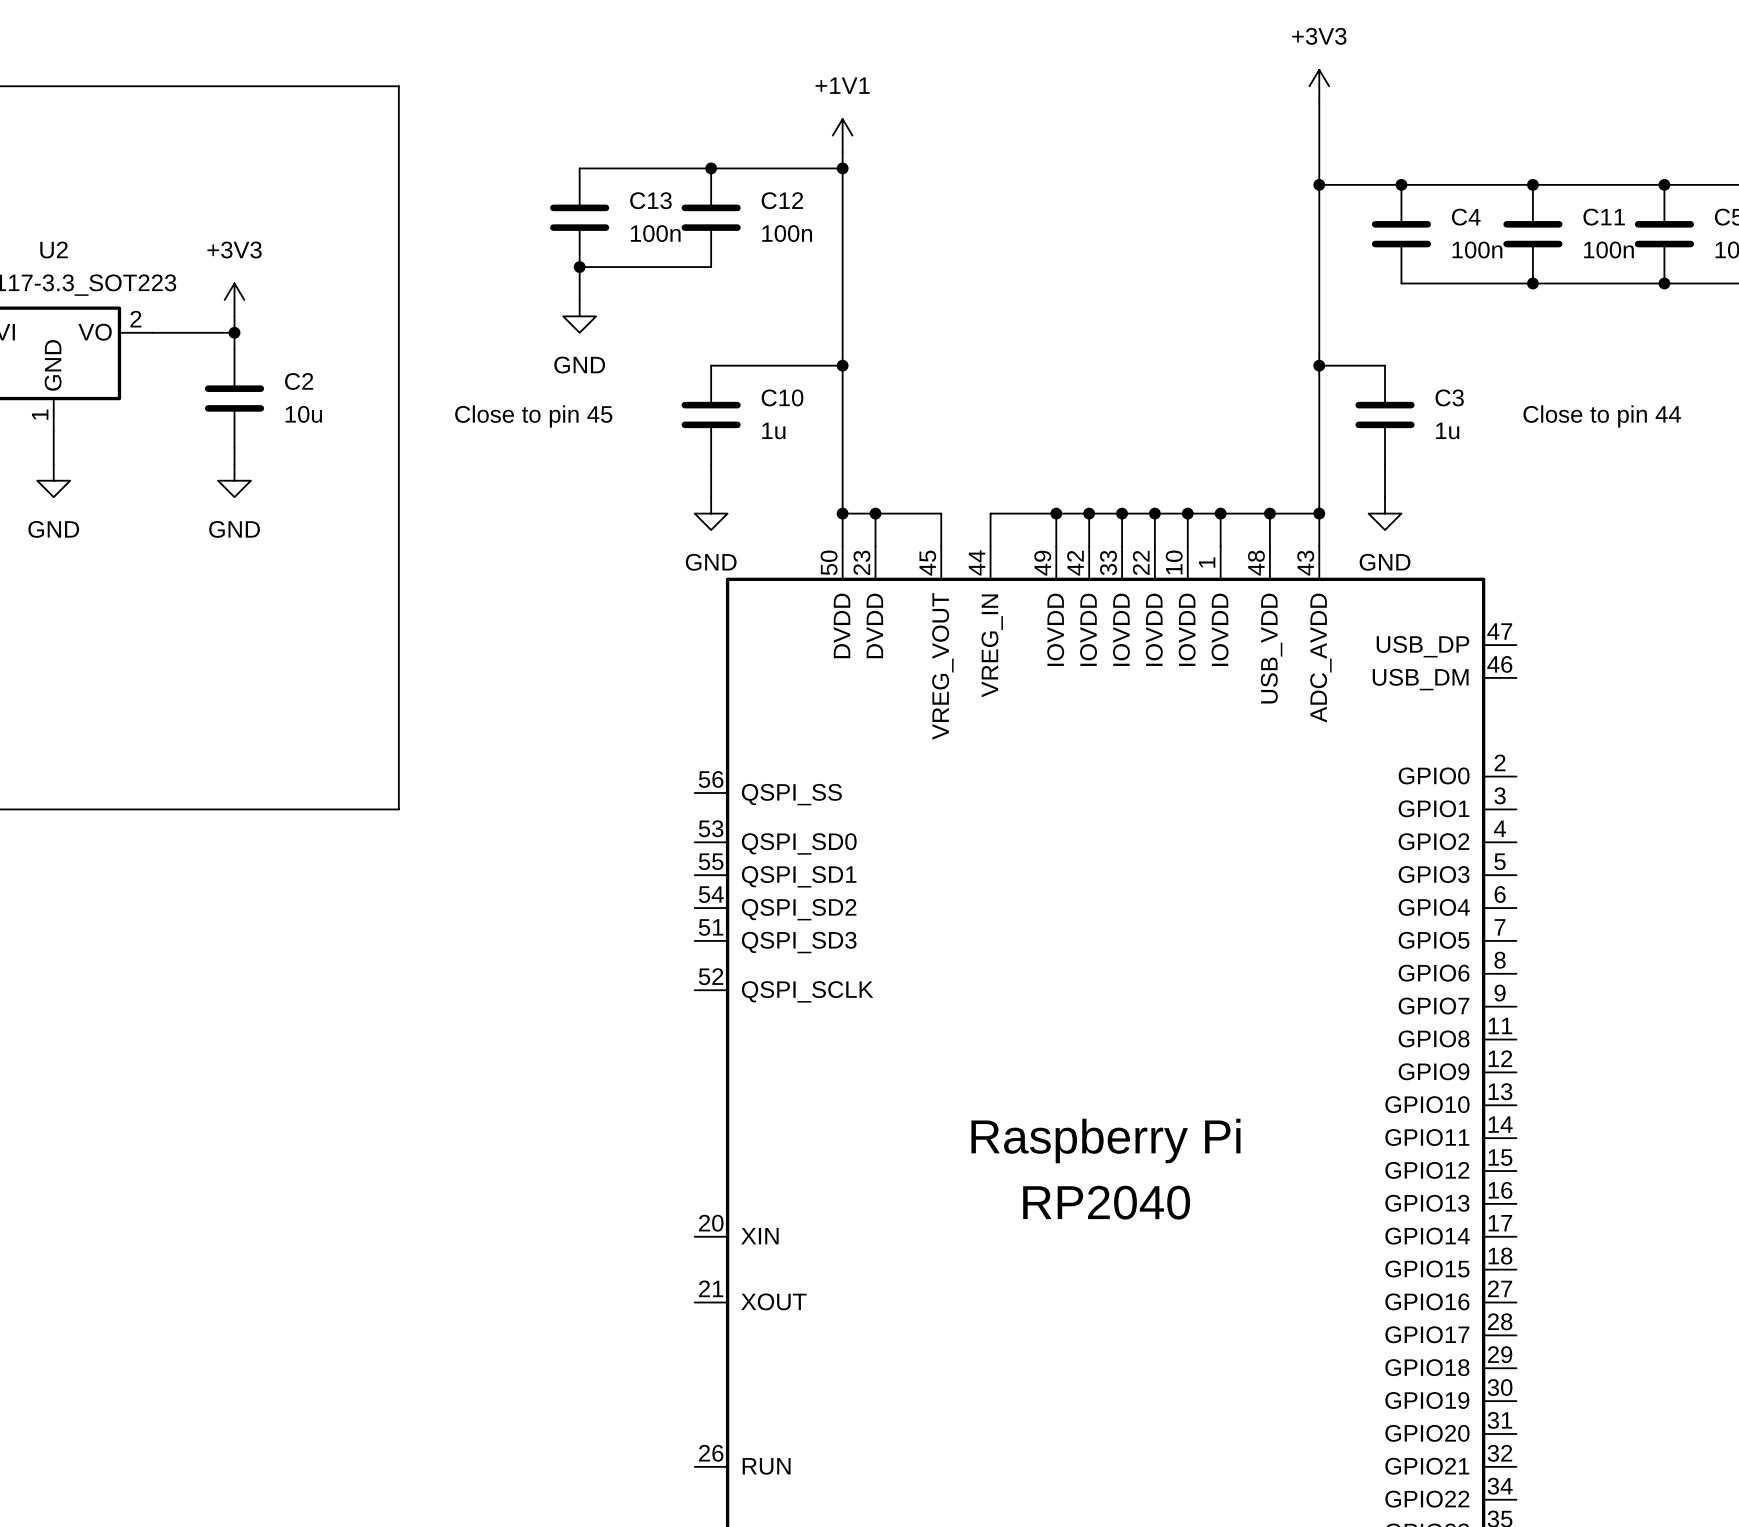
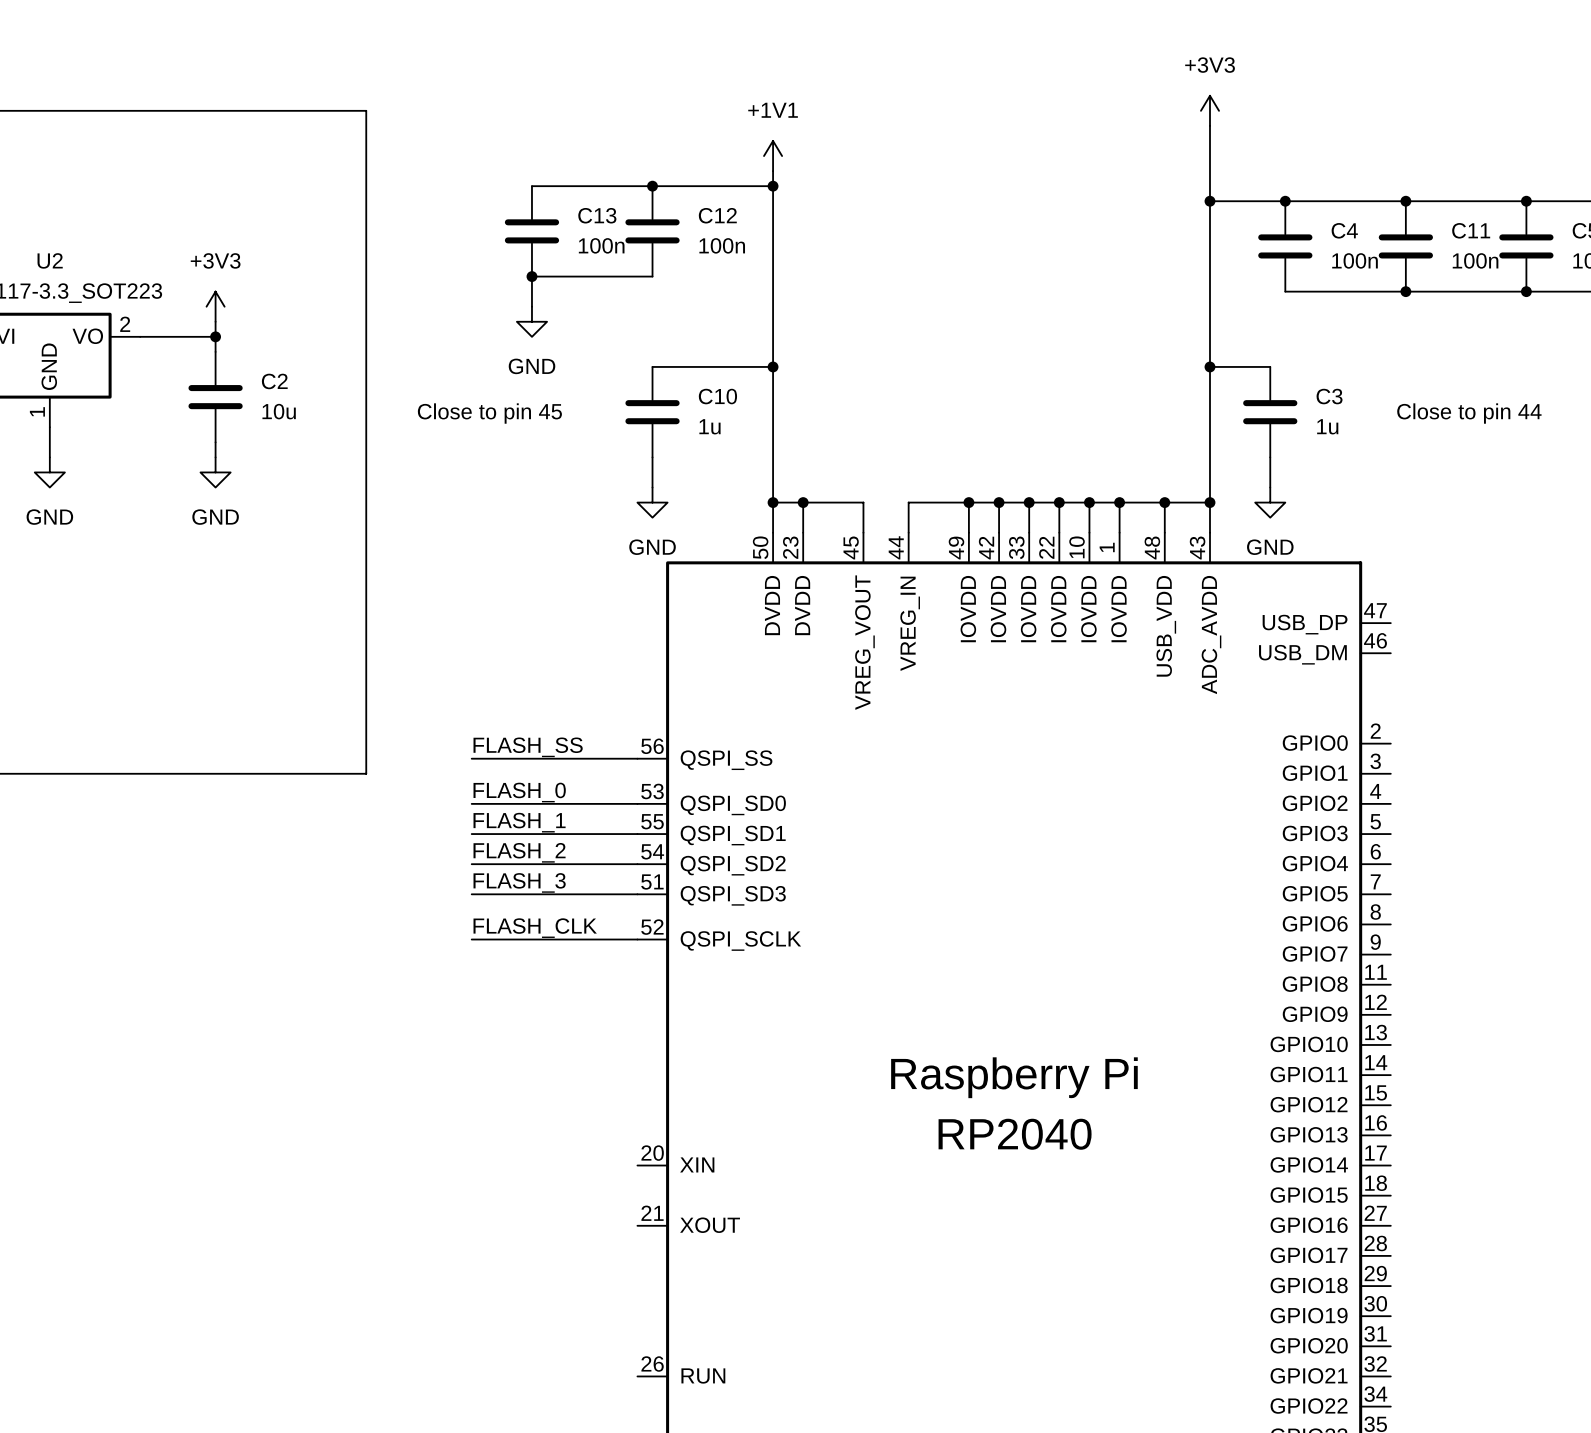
label: none -> FLASH_SS (528, 747)
wire: none -> (471, 758) (637, 758)
label: none -> FLASH_0 (519, 792)
wire: none -> (471, 803) (637, 803)
label: none -> FLASH_1 (519, 822)
wire: none -> (471, 834) (637, 834)
label: none -> FLASH_2 (519, 852)
wire: none -> (471, 864) (637, 864)
label: none -> FLASH_3 (519, 882)
wire: none -> (471, 894) (637, 894)
label: none -> FLASH_CLK (535, 928)
wire: none -> (471, 939) (637, 939)

